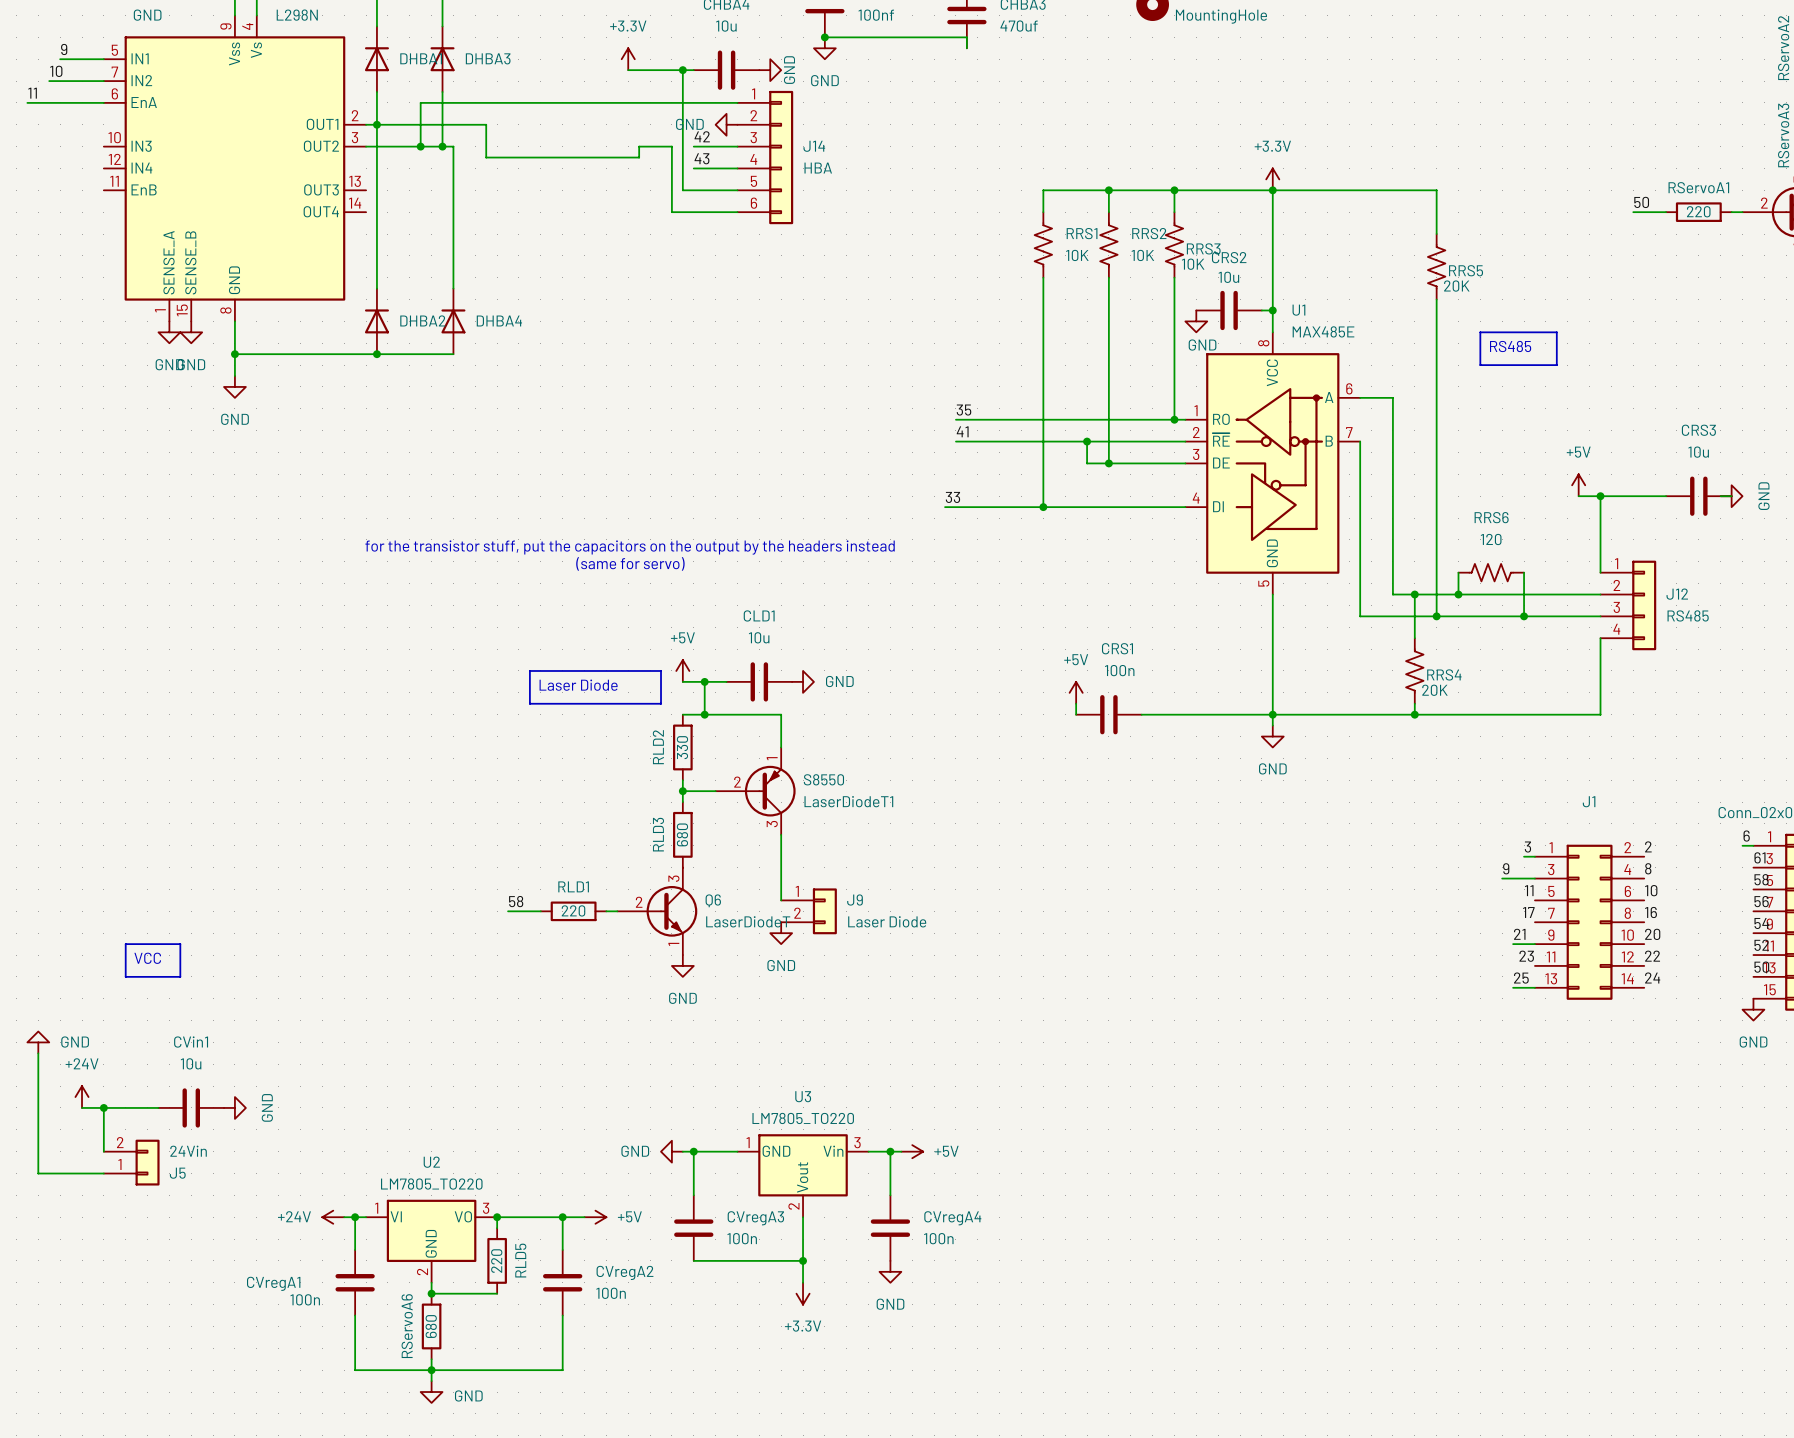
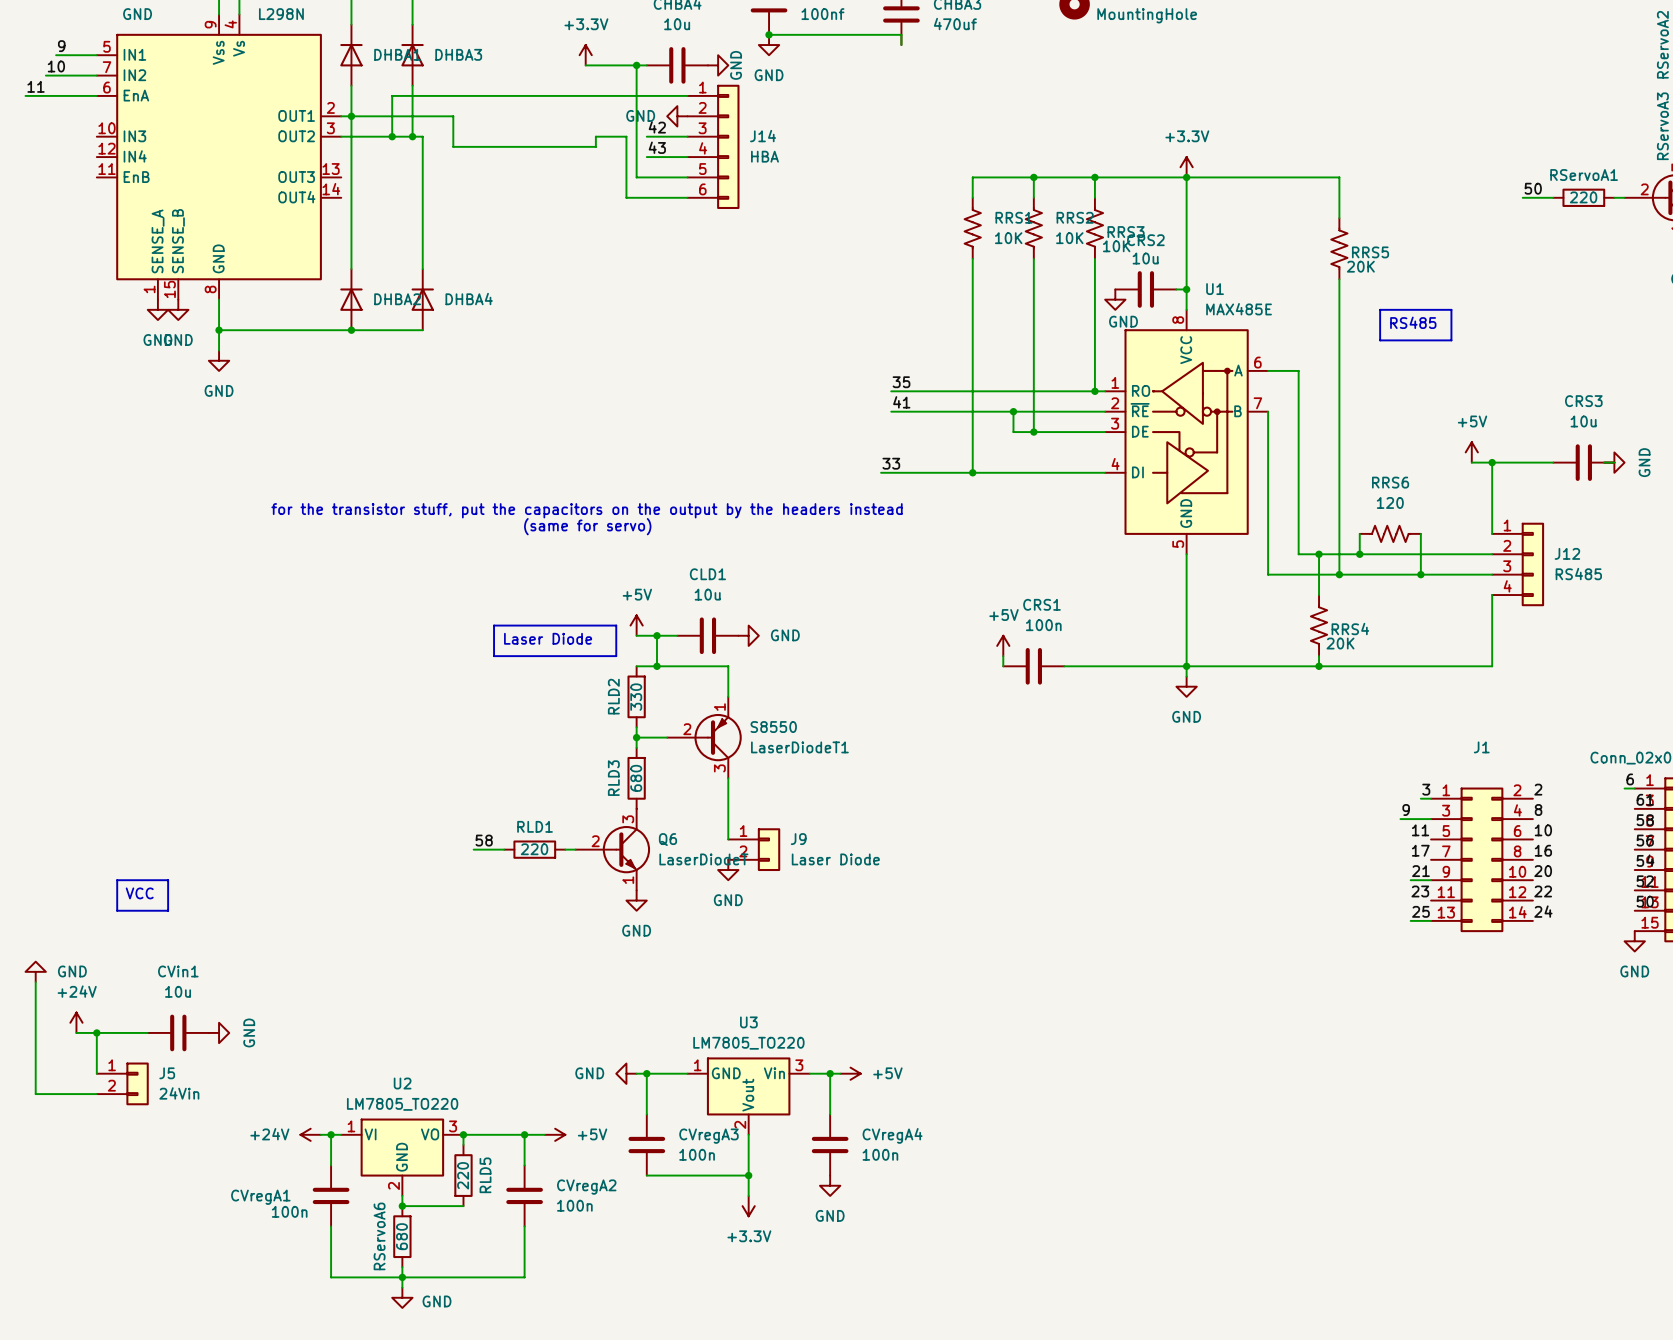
J5 flip: as is (147, 1162) -> up-down (137, 1083)

